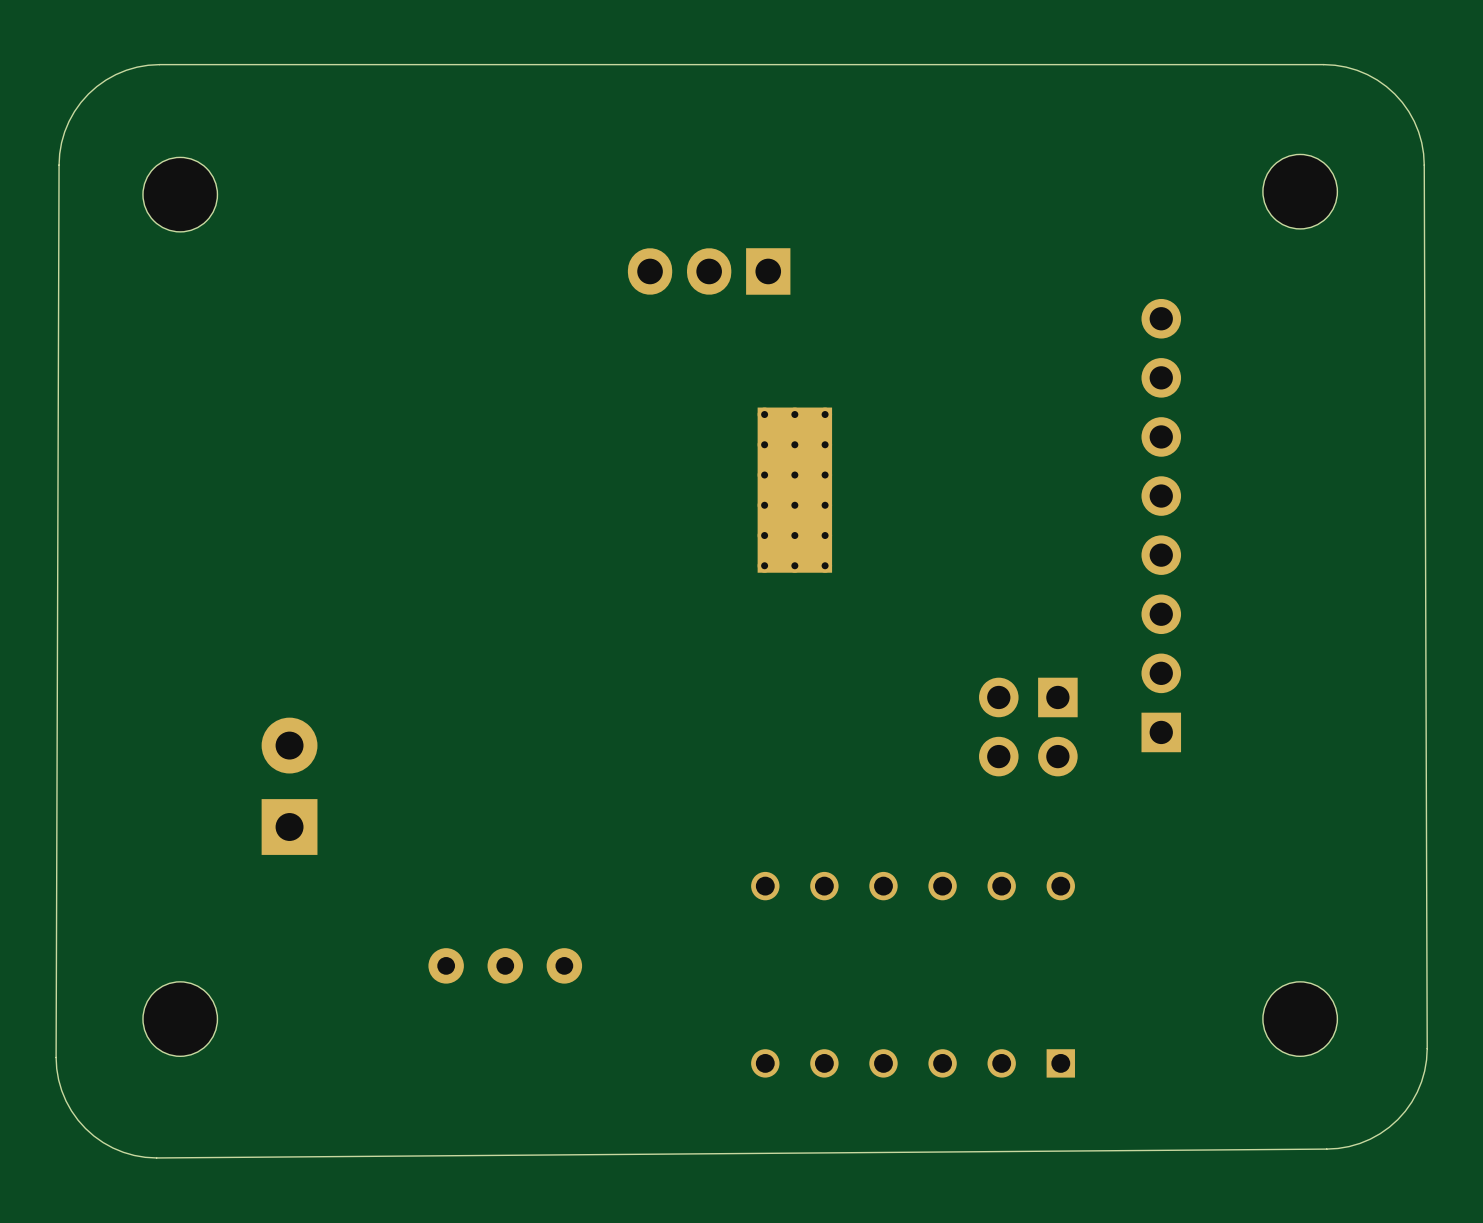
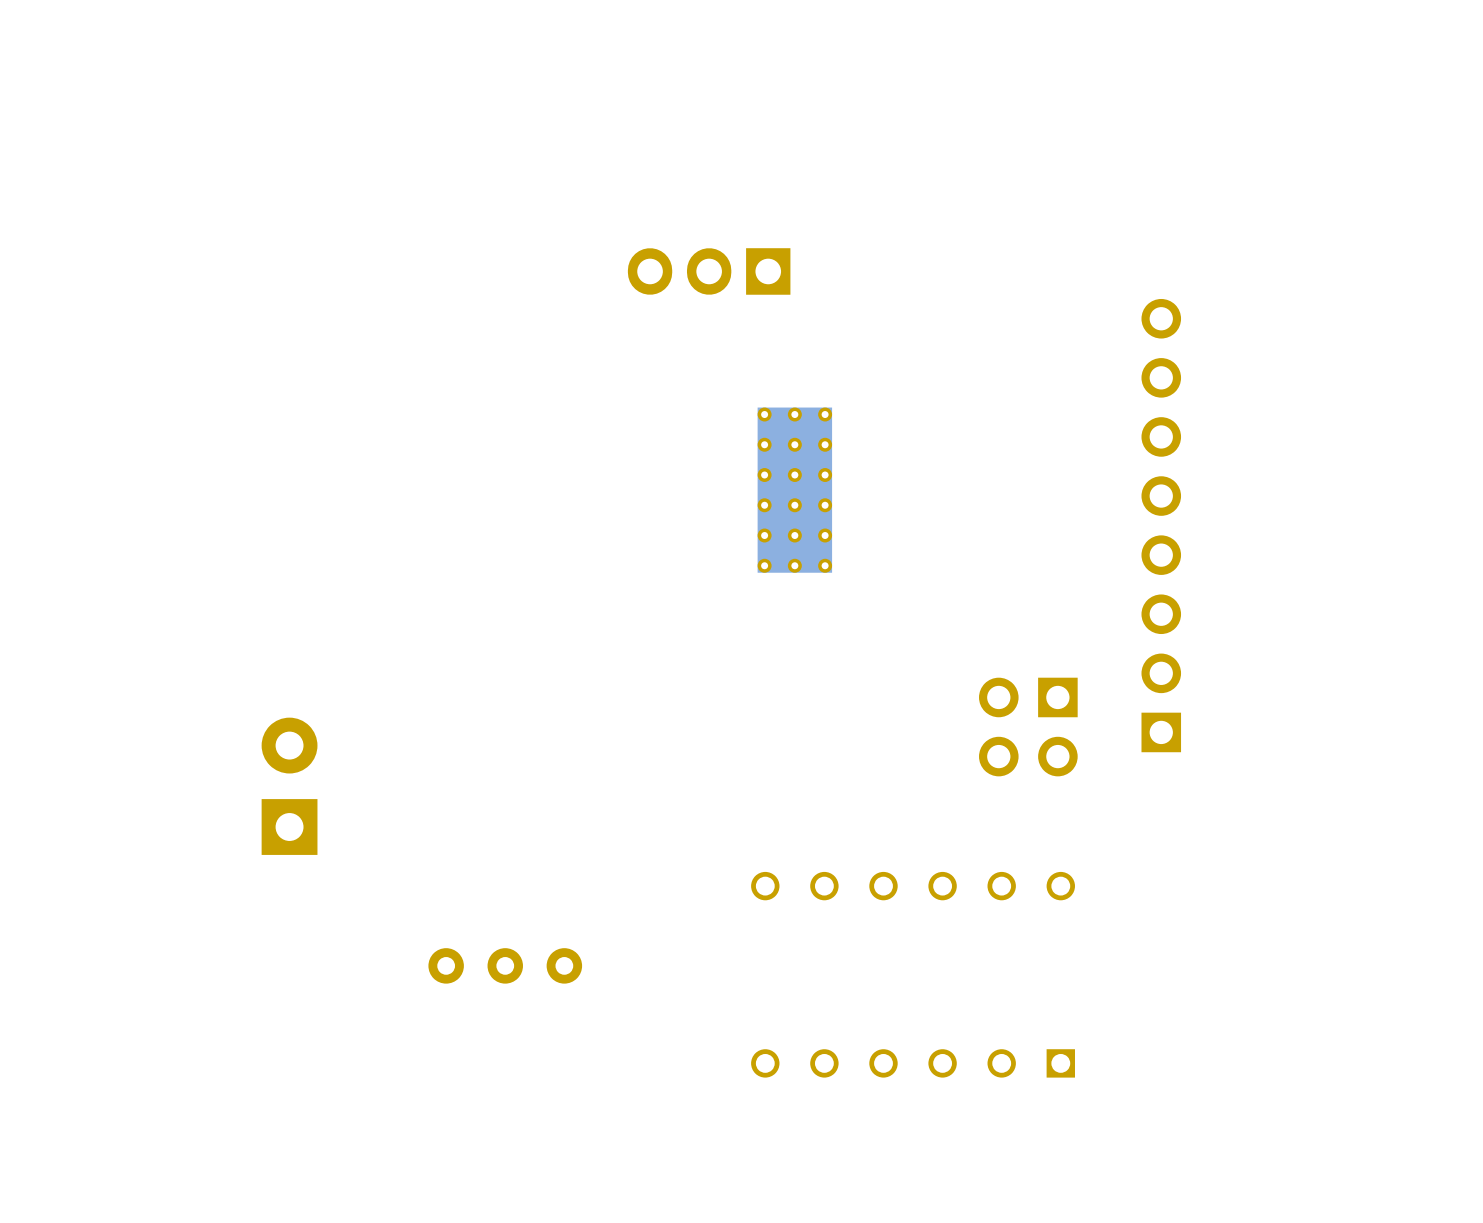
part: (1300, 191) -> none
part: (180, 194) -> none
part: (180, 1019) -> none
part: (1300, 1019) -> none
board edge: (1326, 1149) (1359, 1143) (1380, 1133) (1397, 1119) (1417, 1092) (1426, 1059) (1424, 165) (1421, 142) (1414, 121) (1402, 102) (1386, 86) (1356, 70) (1323, 64) (159, 64) (137, 67) (115, 74) (96, 86) (80, 102) (64, 131) (59, 165) (56, 1057) (58, 1079) (66, 1101) (78, 1120) (93, 1136) (123, 1152) (156, 1157) (1326, 1149) -> none

